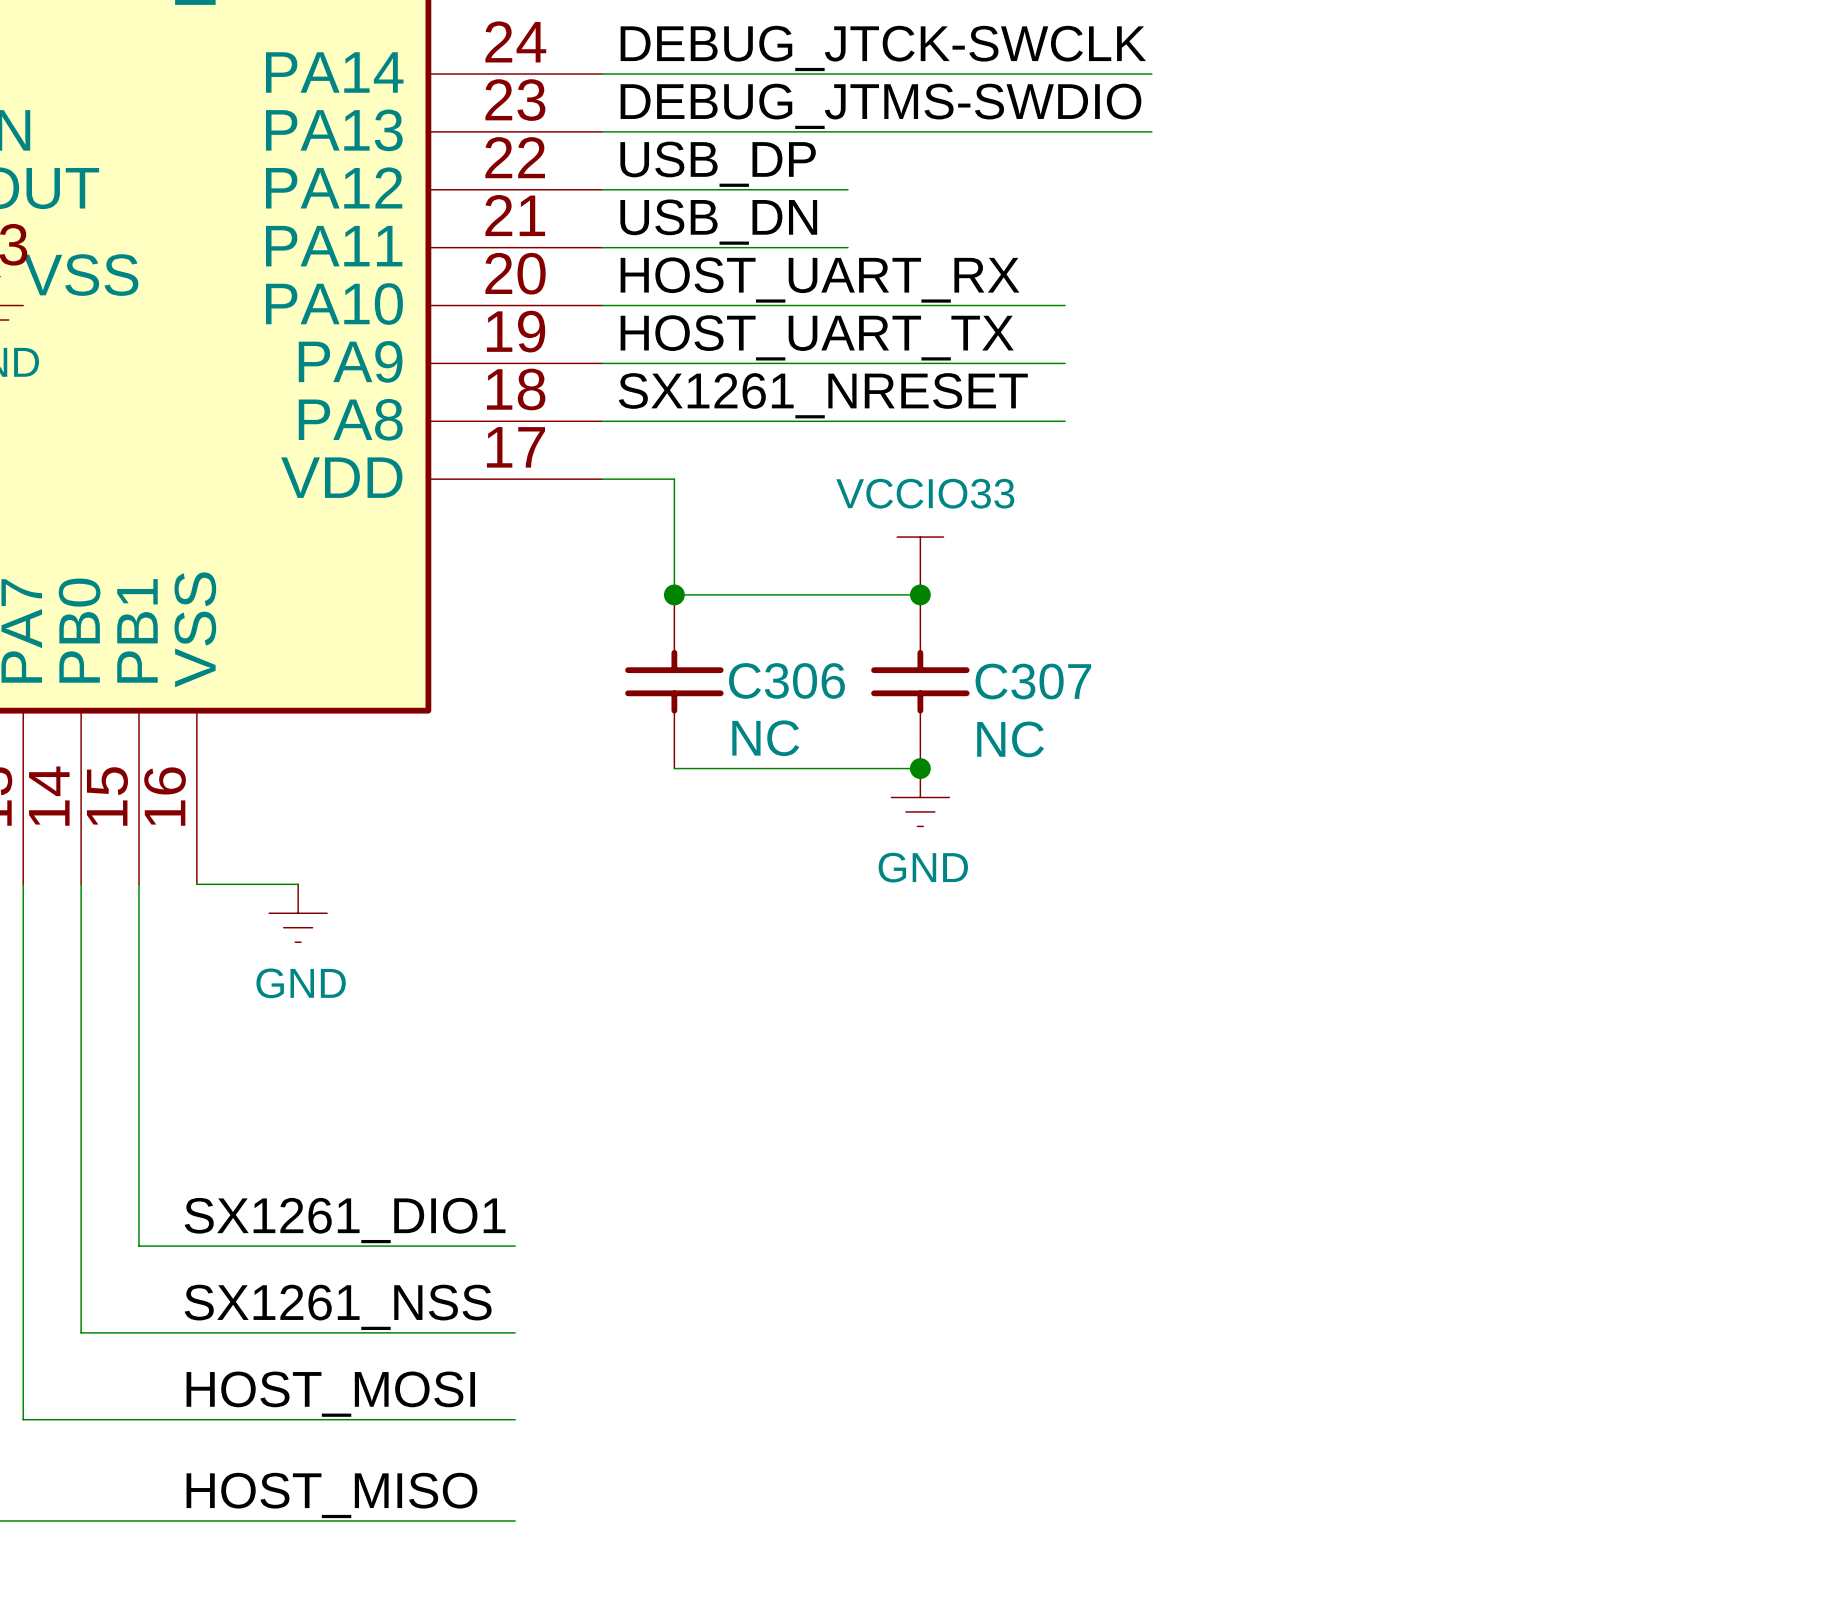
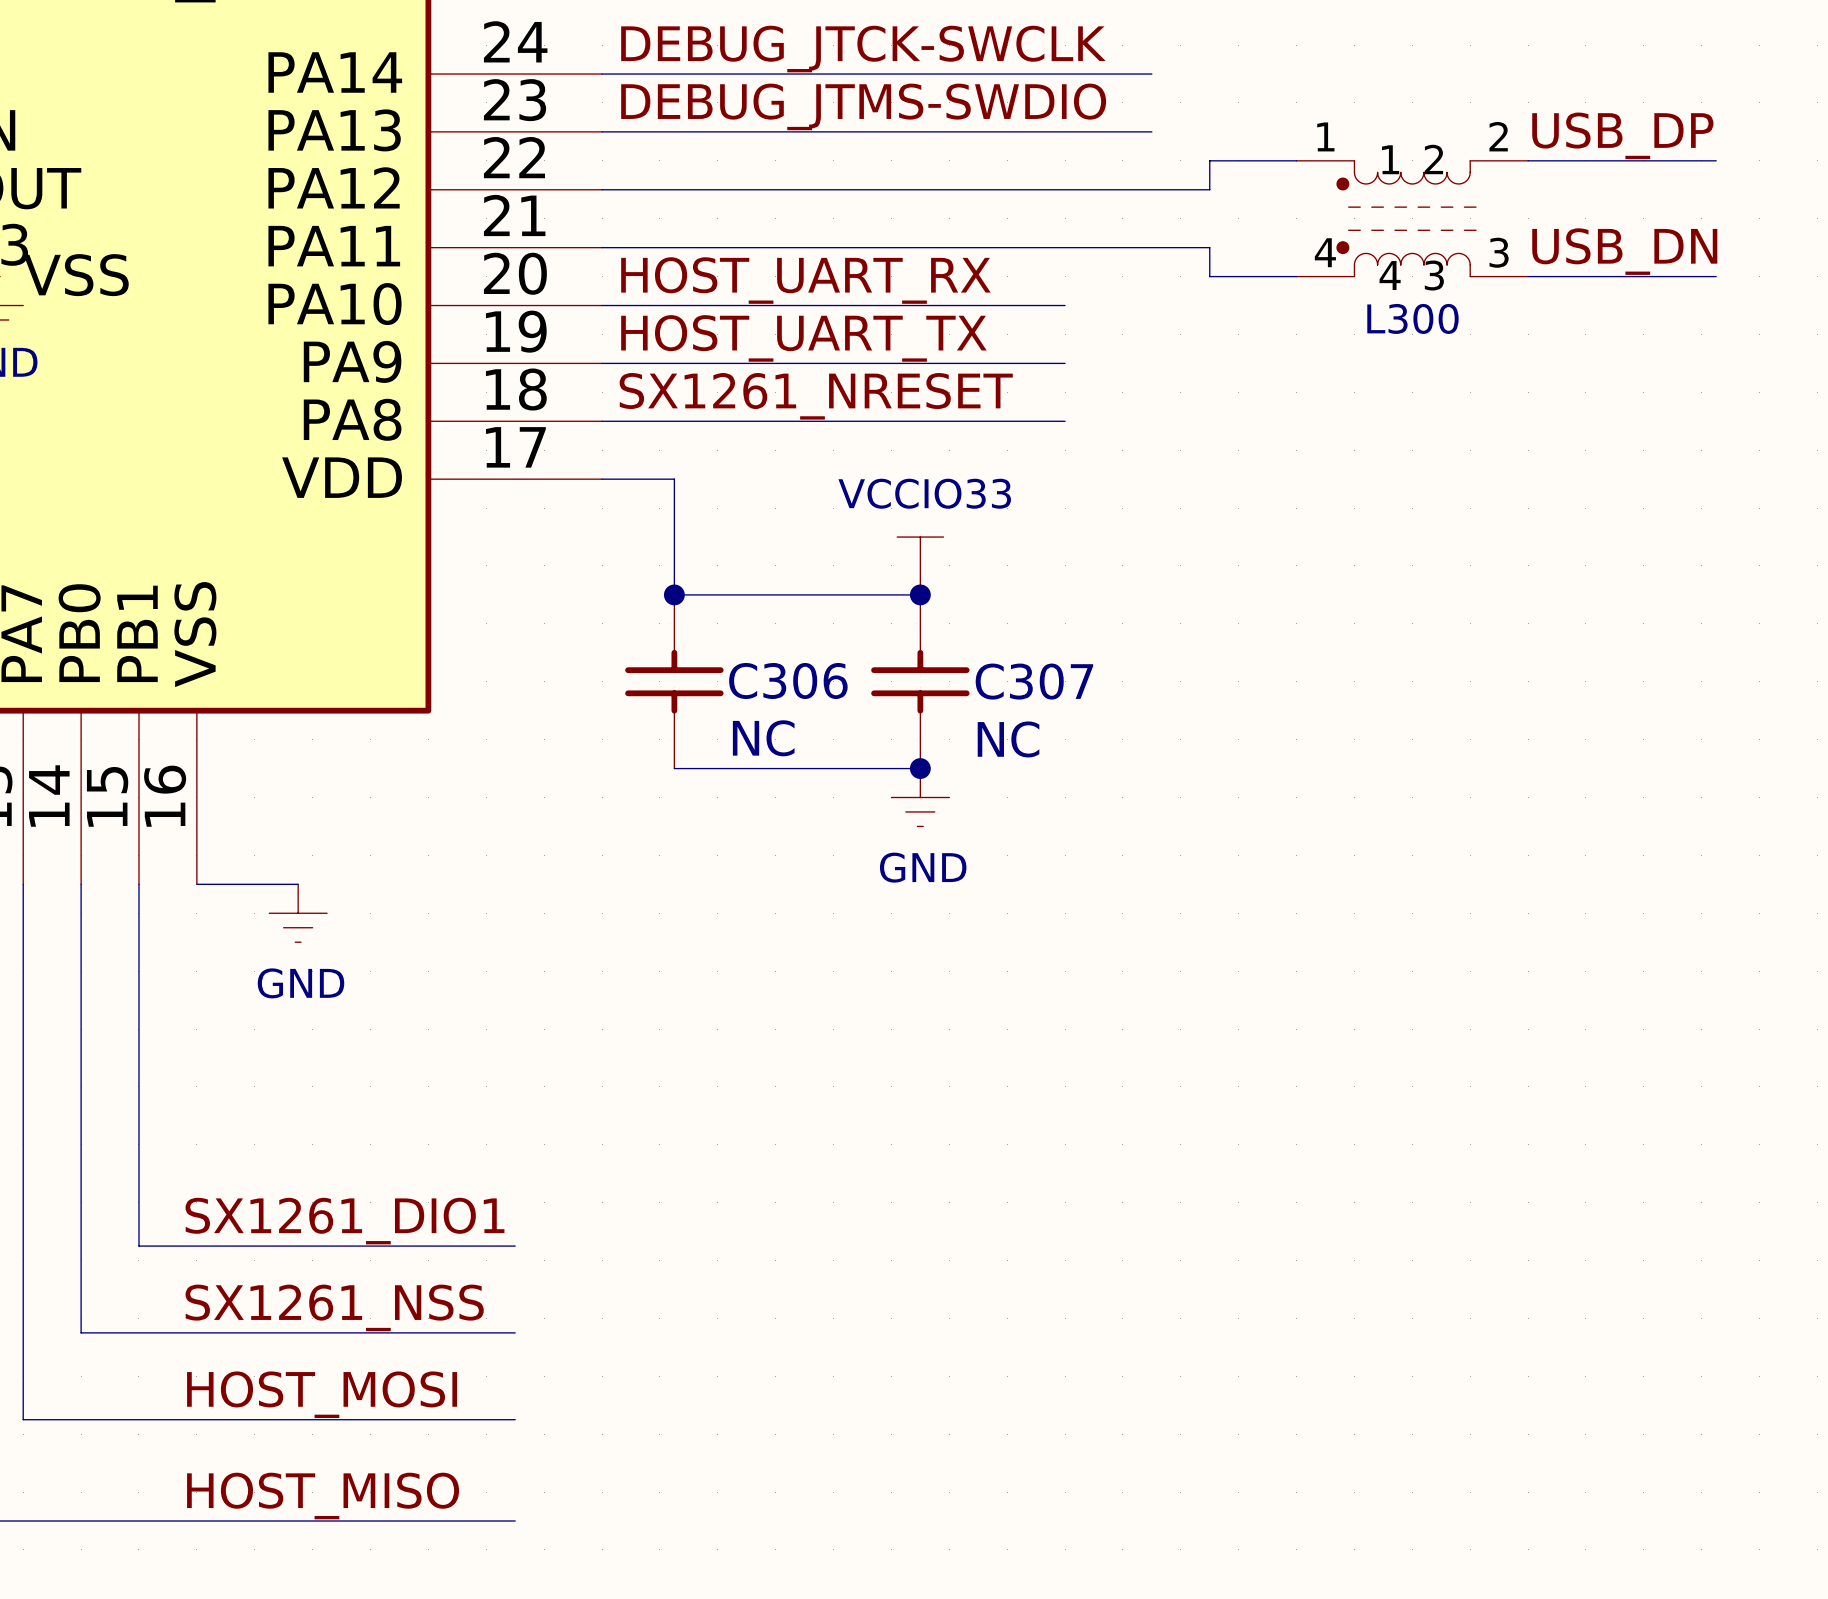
label: none -> USB_DP (1622, 135)
wire: none -> (1296, 160) (1209, 160) (1209, 189) (848, 189)
wire: none -> (1528, 160) (1716, 160)
label: USB_DP (718, 164) -> none
L300: none -> (1412, 218)
label: USB_DN (718, 222) -> none
wire: none -> (848, 247) (1209, 247) (1209, 276) (1296, 276)
label: none -> USB_DN (1624, 251)
wire: none -> (1528, 276) (1716, 276)

